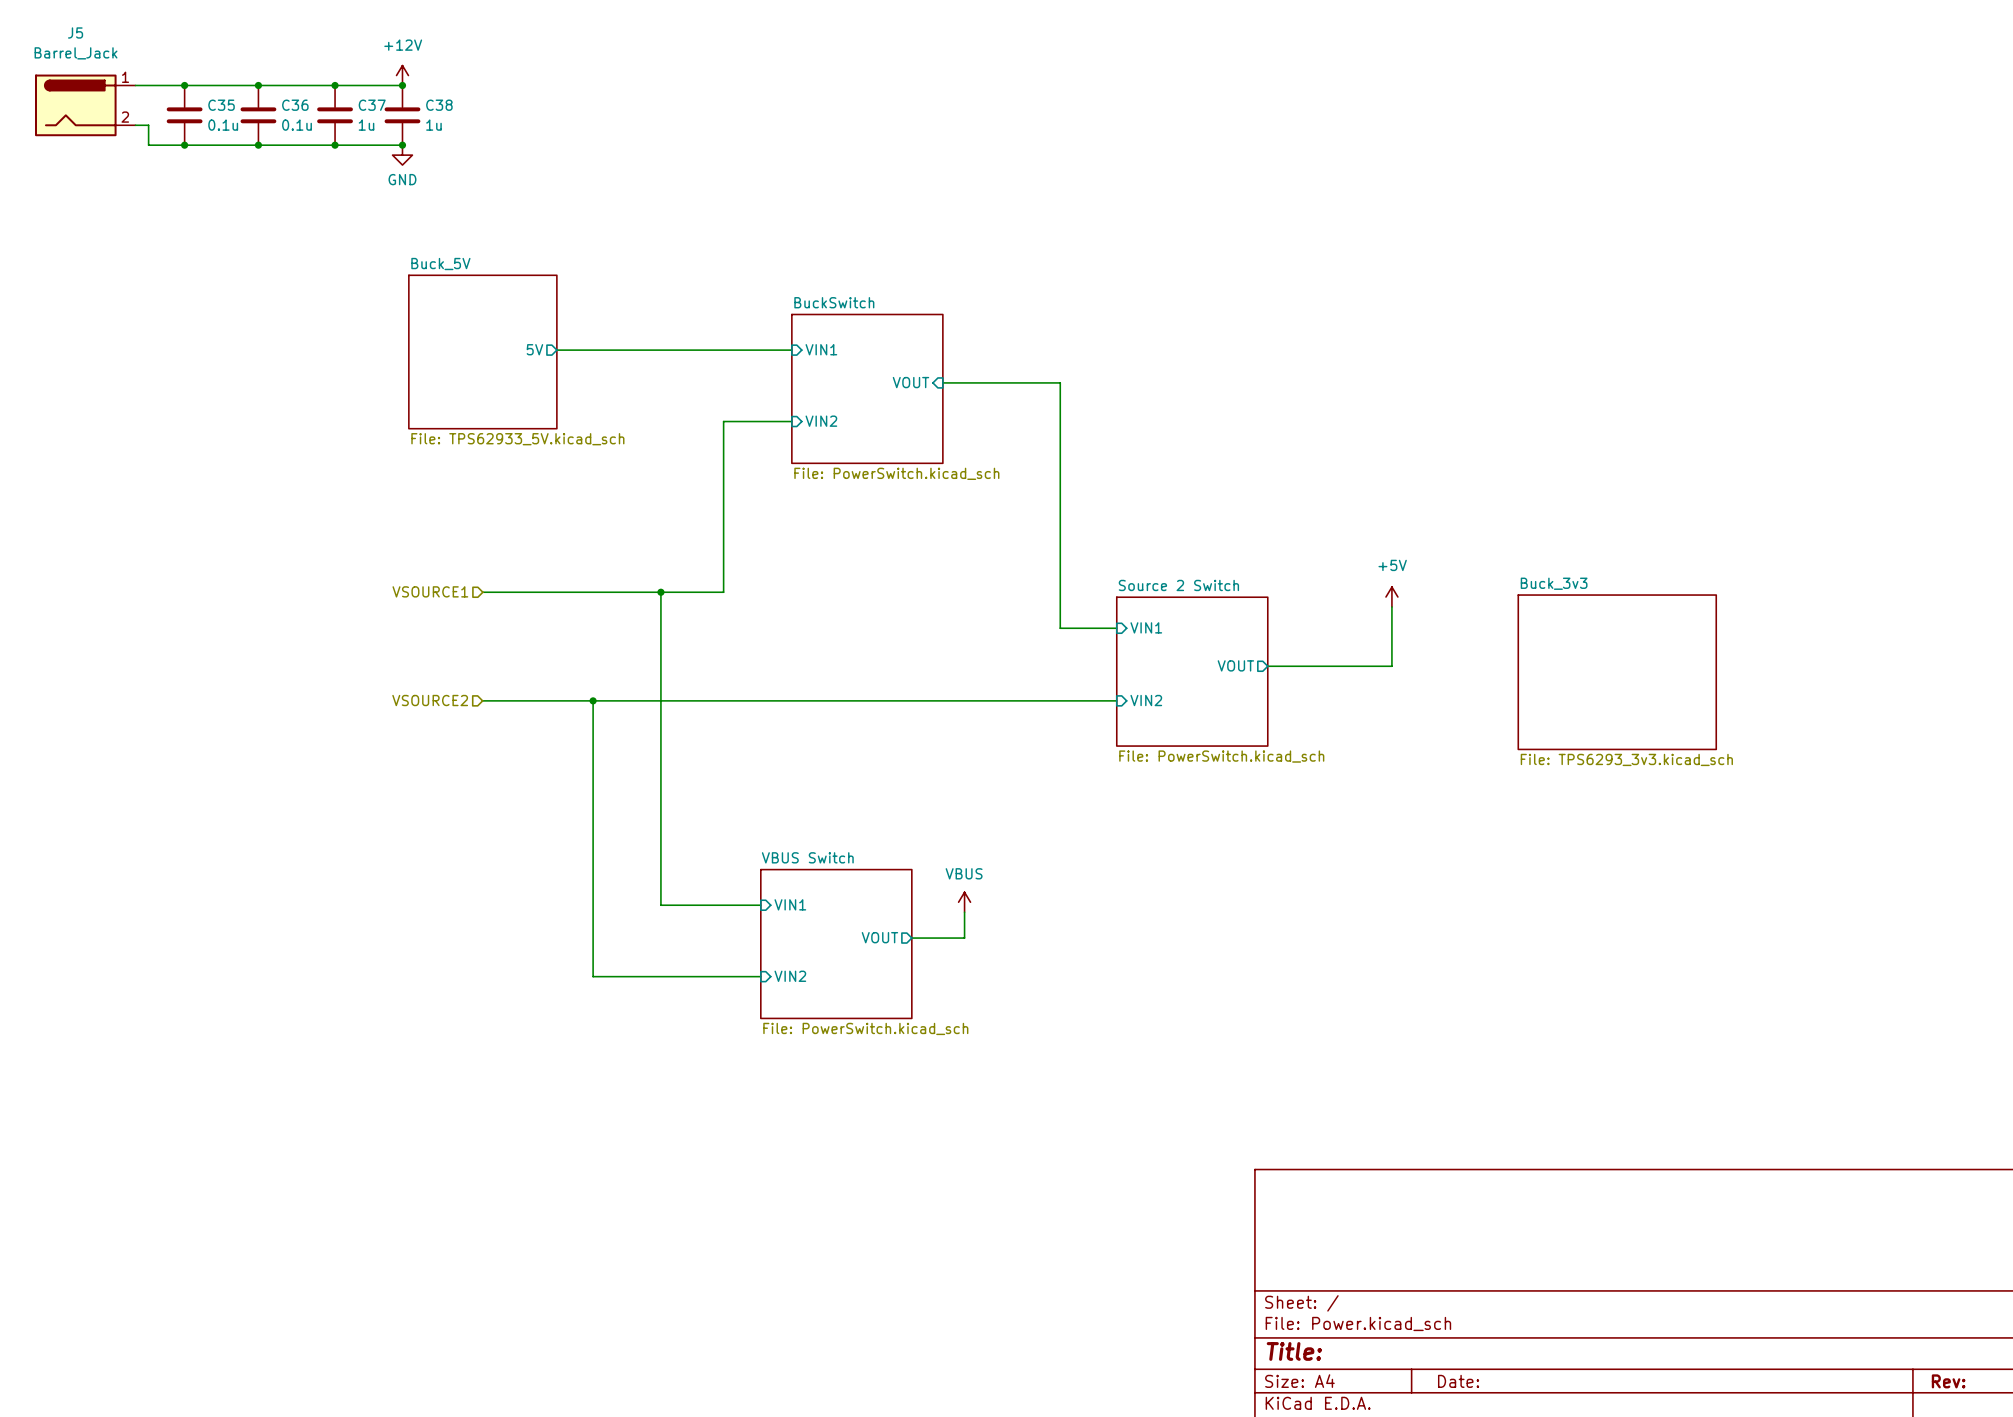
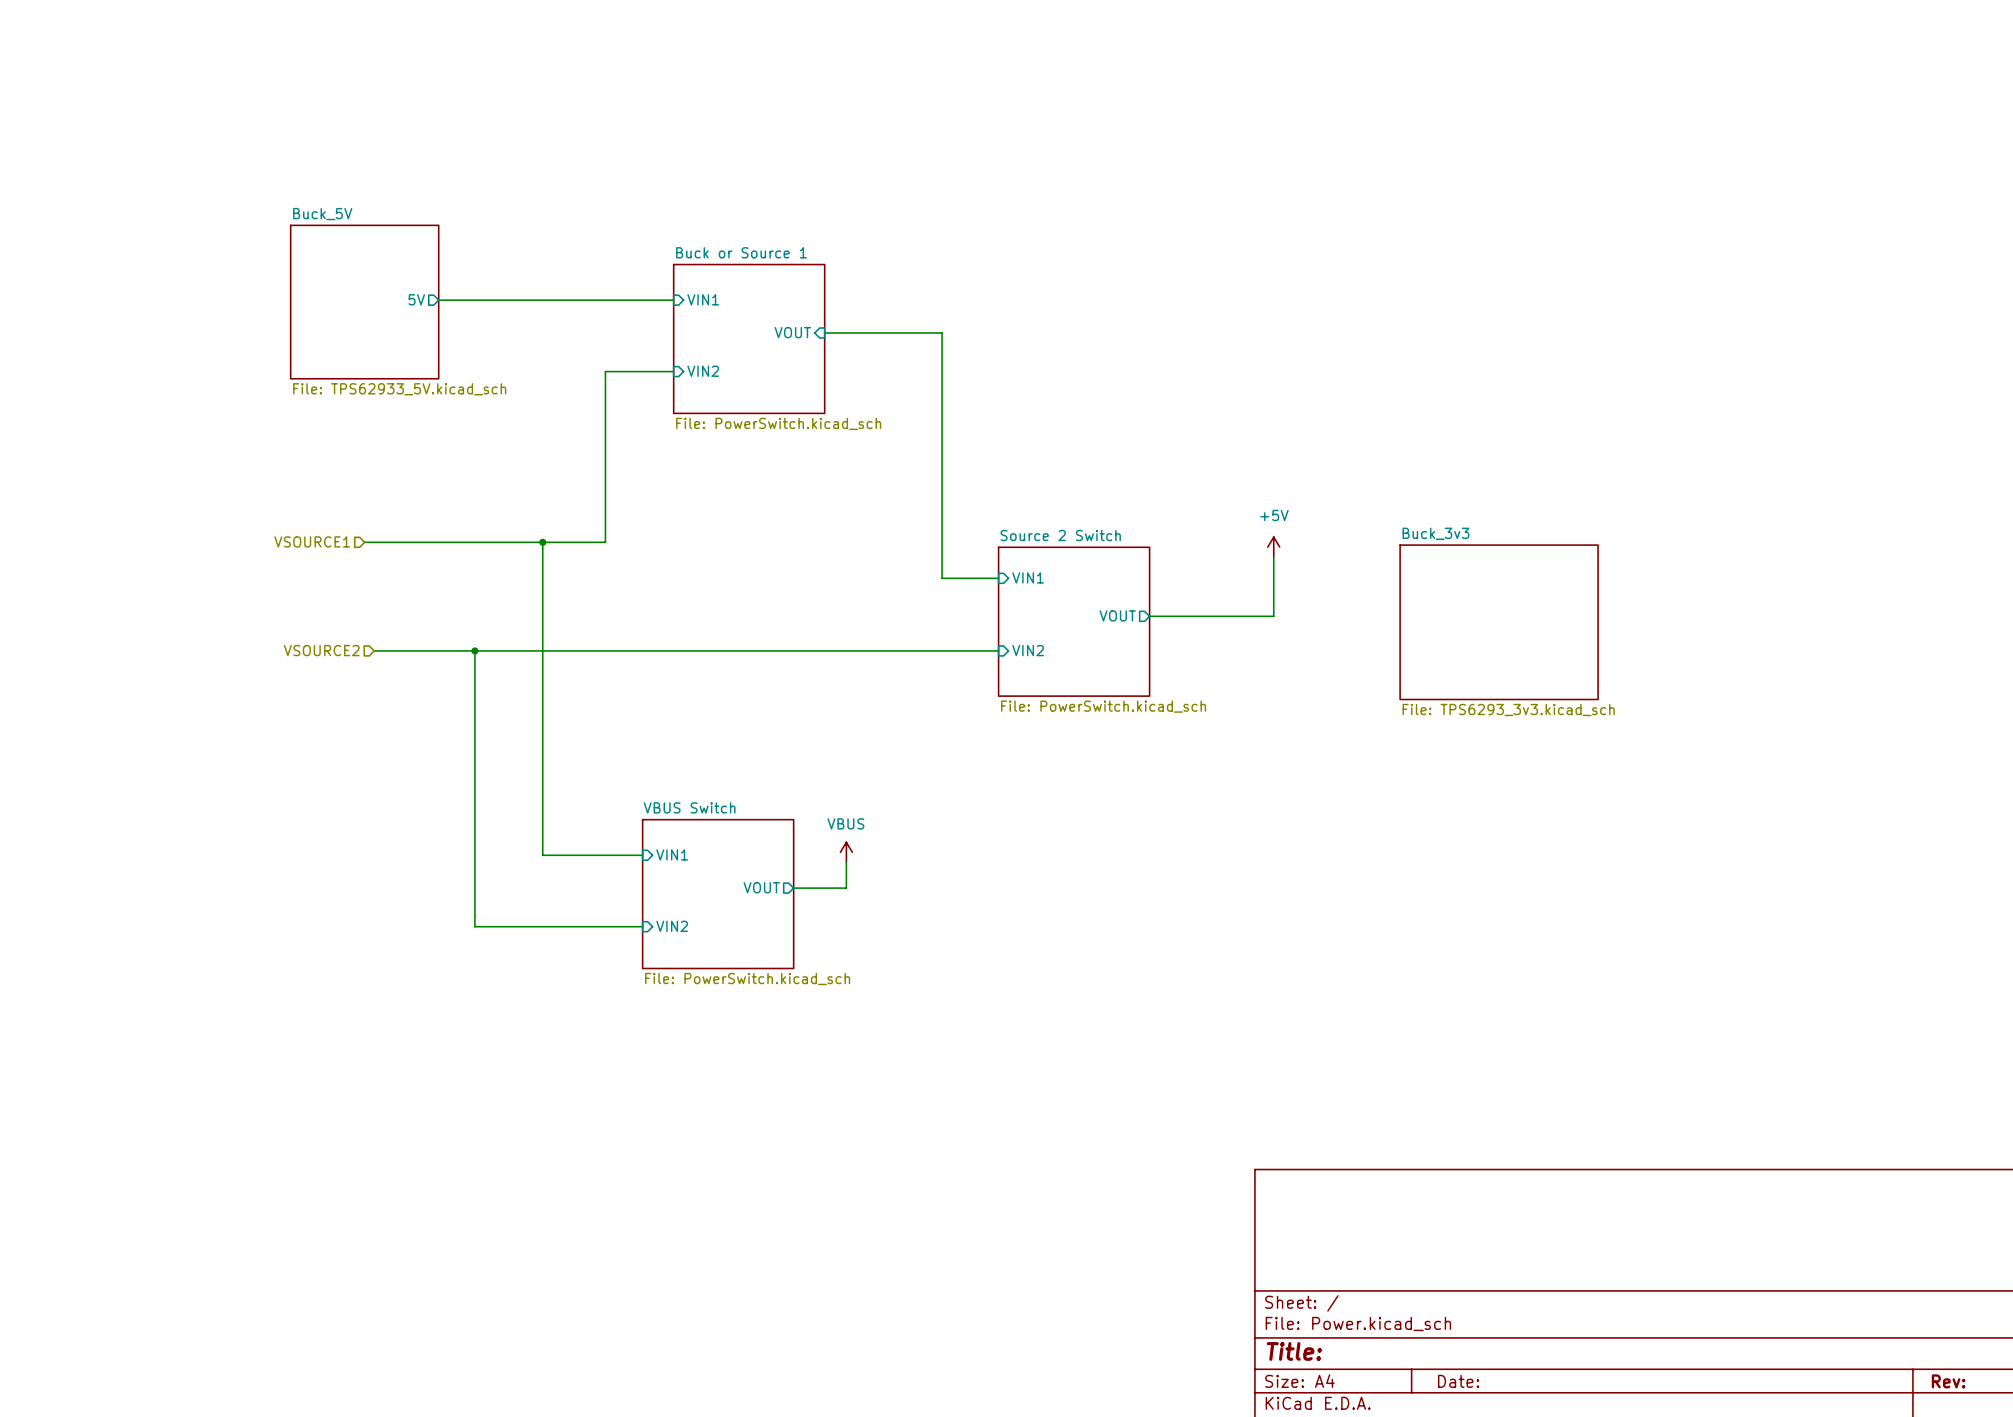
power symbol: +12V (402, 75) -> none
wire: (135, 85) (402, 85) -> none
junction: (184, 85) -> none
junction: (258, 85) -> none
junction: (335, 85) -> none
junction: (402, 85) -> none
J5: Barrel_Jack (85, 105) -> none
C35: 0.1u (184, 115) -> none
C36: 0.1u (258, 115) -> none
C37: 1u (335, 115) -> none
C38: 1u (402, 115) -> none
wire: (135, 125) (148, 125) (148, 145) (402, 145) -> none
junction: (184, 145) -> none
junction: (258, 145) -> none
junction: (335, 145) -> none
junction: (402, 145) -> none
power symbol: GND (402, 155) -> none
sheet Buck or Source 1: none -> File: PowerSwitch.kicad_sch (749, 338)
sheet pin position: 5V (534, 349) -> 5V (416, 299)
sheet pin position: VIN1 (821, 349) -> VIN1 (703, 299)
wire: (556, 350) (791, 350) -> (438, 300) (673, 300)
sheet Buck_5V position: (482, 352) -> (364, 302)
sheet pin position: VOUT (910, 382) -> VOUT (792, 332)
wire: (942, 382) (1060, 382) (1060, 628) (1116, 628) -> (824, 333) (942, 333) (942, 578) (998, 578)
sheet BuckSwitch: File: PowerSwitch.kicad_sch (867, 388) -> none
wire: (791, 421) (723, 421) (723, 592) (482, 592) -> (673, 371) (605, 371) (605, 542) (364, 542)
sheet pin position: VIN2 (821, 421) -> VIN2 (703, 371)
junction: none -> (542, 542)
hierarchical label position: VSOURCE1 (430, 591) -> VSOURCE1 (312, 541)
wire: (660, 592) (660, 905) (760, 905) -> (542, 542) (542, 855) (642, 855)
junction: (660, 592) -> none
power symbol position: +5V (1391, 597) -> +5V (1273, 547)
wire: (1391, 606) (1391, 666) (1267, 666) -> (1273, 557) (1273, 616) (1149, 616)
sheet pin position: VIN1 (1146, 627) -> VIN1 (1028, 577)
wire: none -> (374, 650) (998, 650)
junction: none -> (474, 650)
sheet pin position: VOUT (1235, 665) -> VOUT (1117, 615)
sheet Source 2 Switch position: (1192, 671) -> (1074, 621)
sheet Buck_3v3 position: (1617, 672) -> (1499, 622)
hierarchical label position: VSOURCE2 (430, 700) -> VSOURCE2 (321, 650)
wire: (482, 700) (1116, 700) -> none
wire: (593, 700) (593, 976) (760, 976) -> (474, 650) (474, 926) (642, 926)
junction: (593, 700) -> none
sheet pin position: VIN2 (1146, 700) -> VIN2 (1028, 650)
power symbol position: VBUS (964, 902) -> VBUS (846, 852)
sheet pin position: VIN1 (790, 904) -> VIN1 (672, 854)
wire: (964, 912) (964, 938) (911, 938) -> (846, 862) (846, 888) (793, 888)
sheet pin position: VOUT (879, 937) -> VOUT (761, 887)
sheet VBUS Switch position: (836, 944) -> (718, 894)
sheet pin position: VIN2 (790, 976) -> VIN2 (672, 926)

